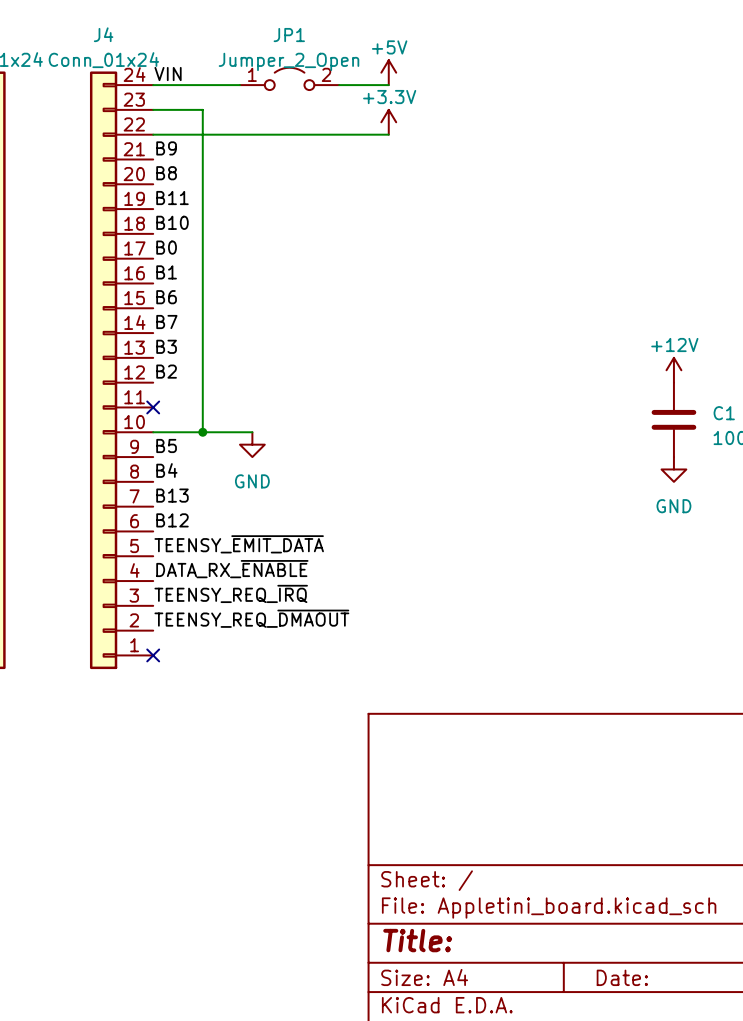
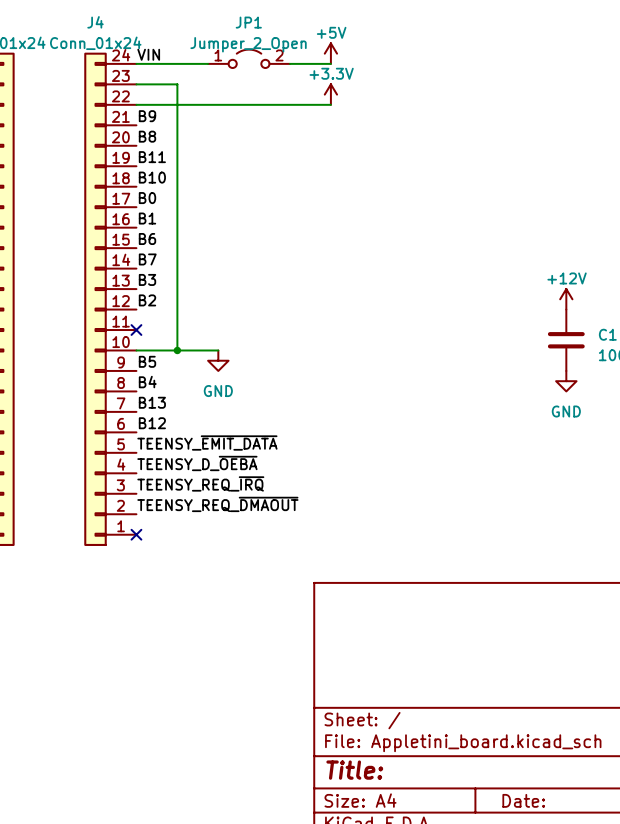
label: DATA_RX_~{ENABLE} (232, 569) -> TEENSY_D_~{OEBA} (197, 463)

